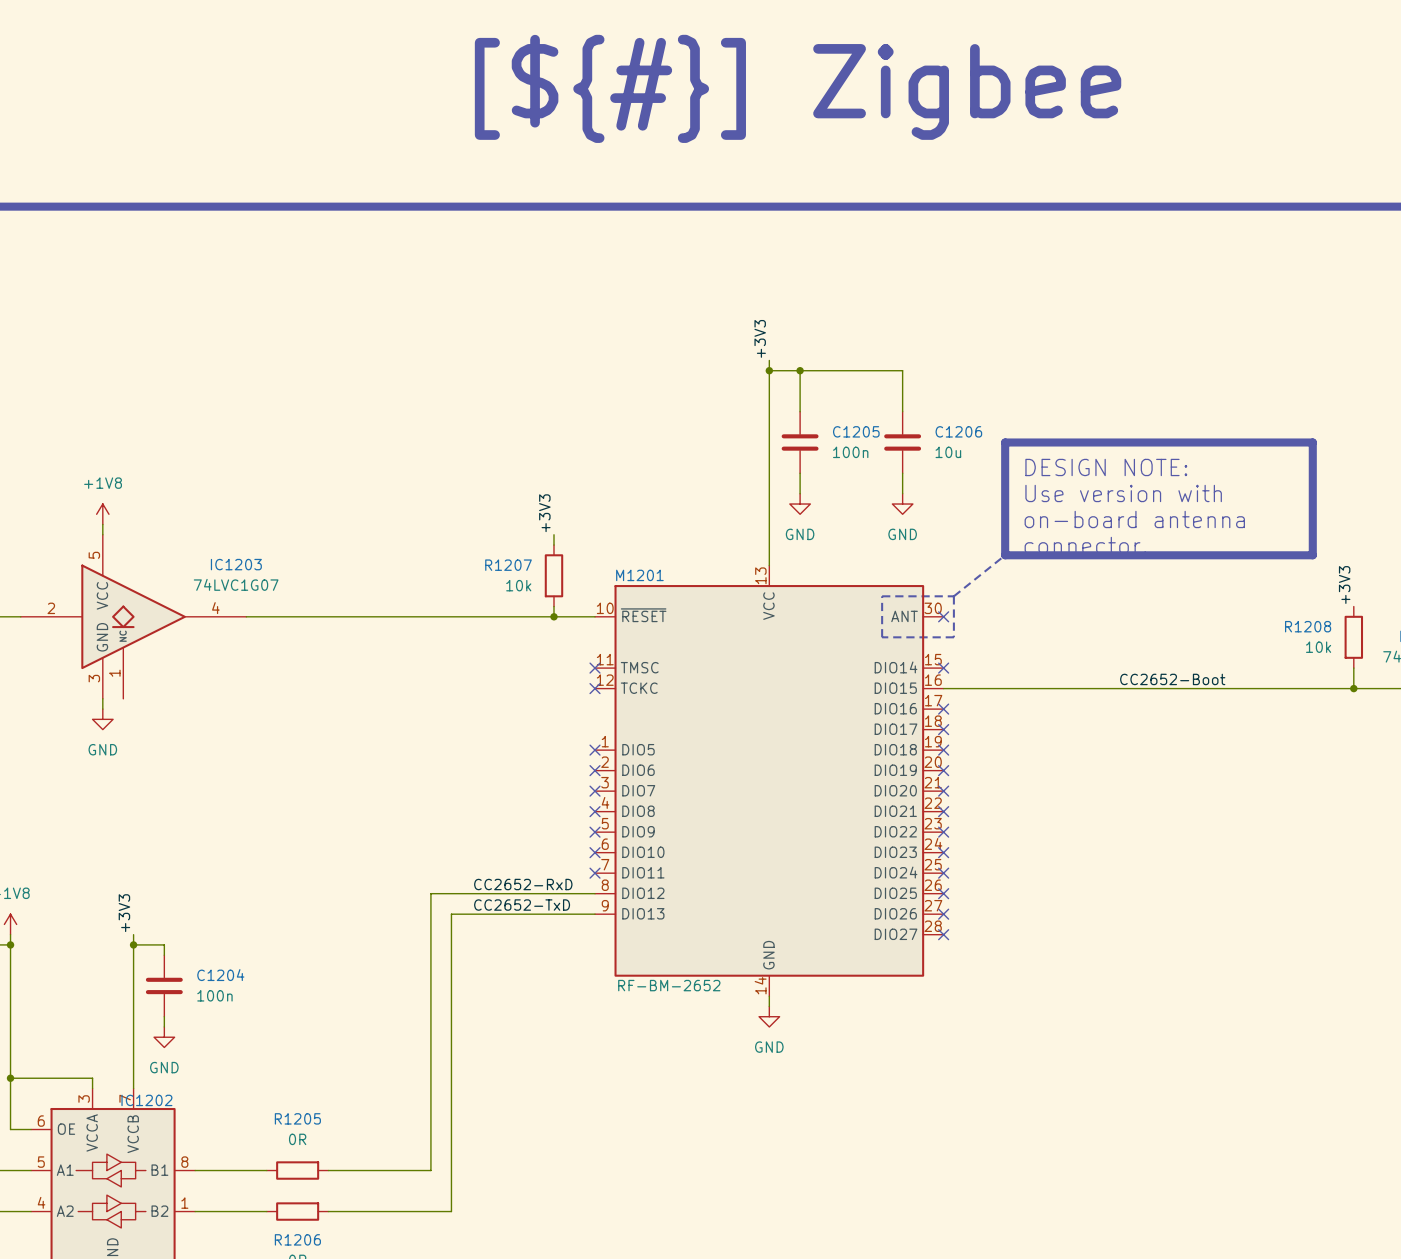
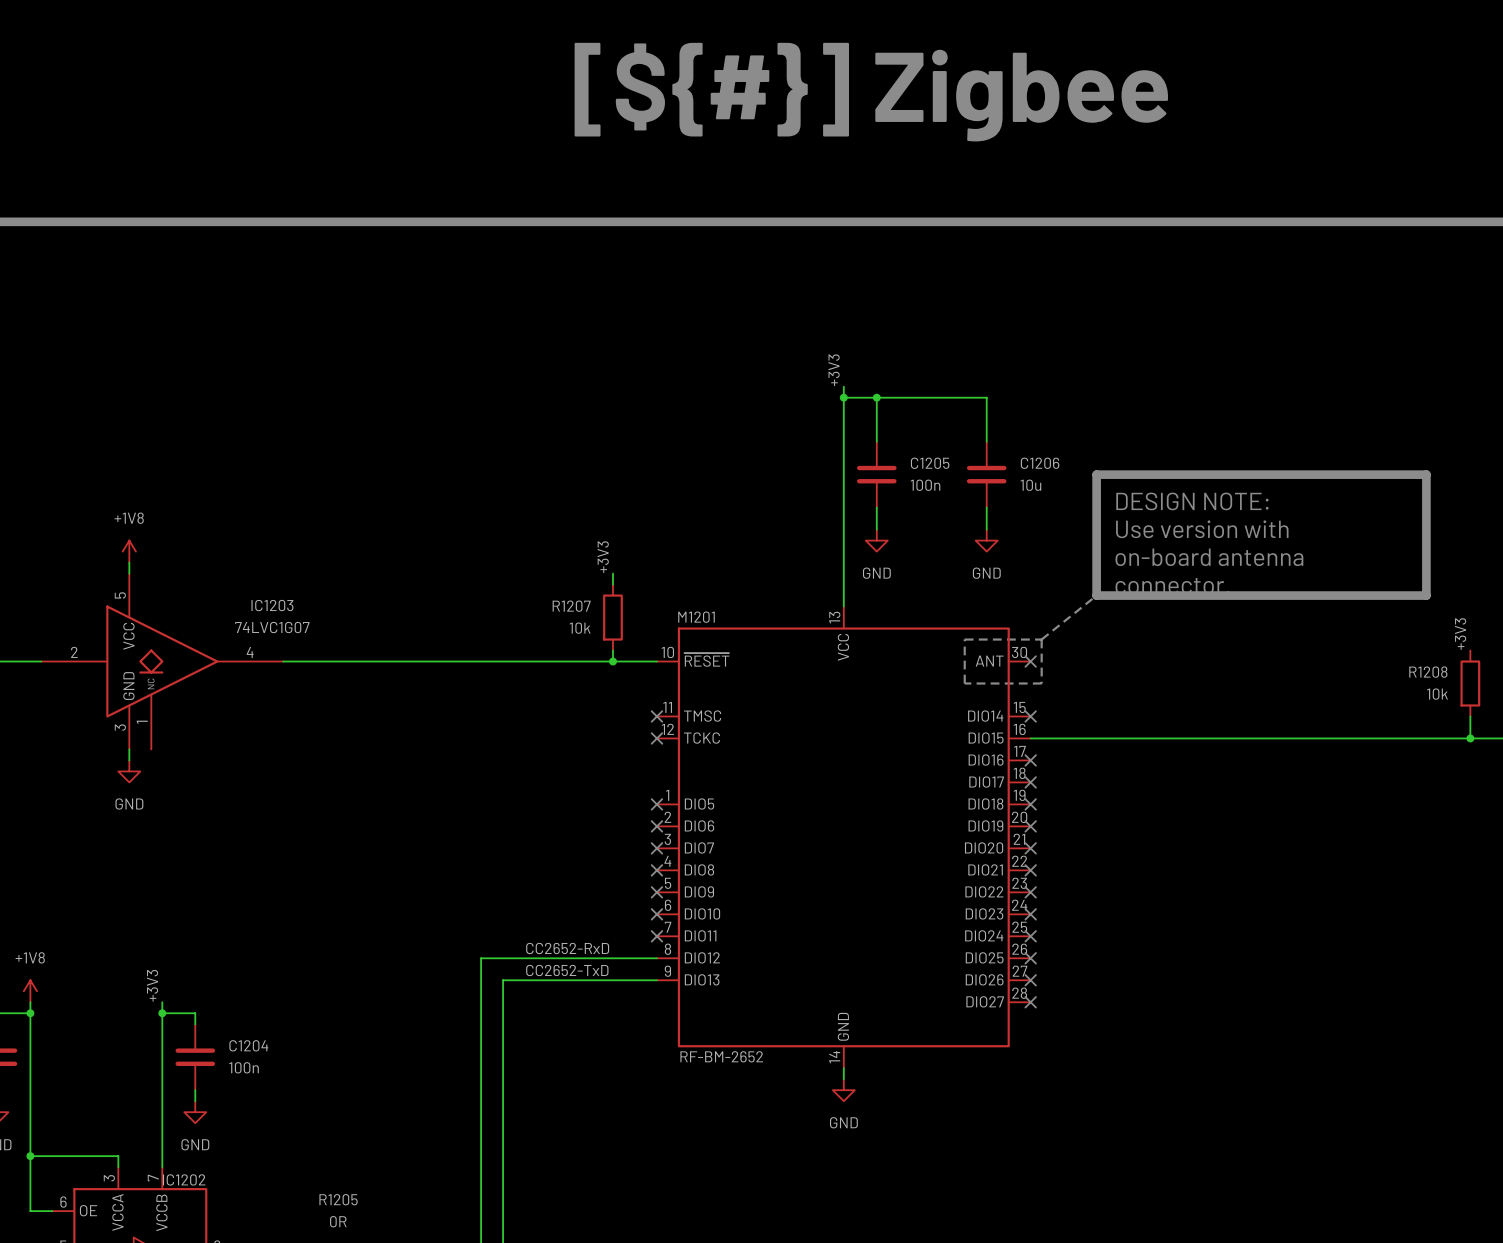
label: CC2652-Boot (1172, 679) -> none

